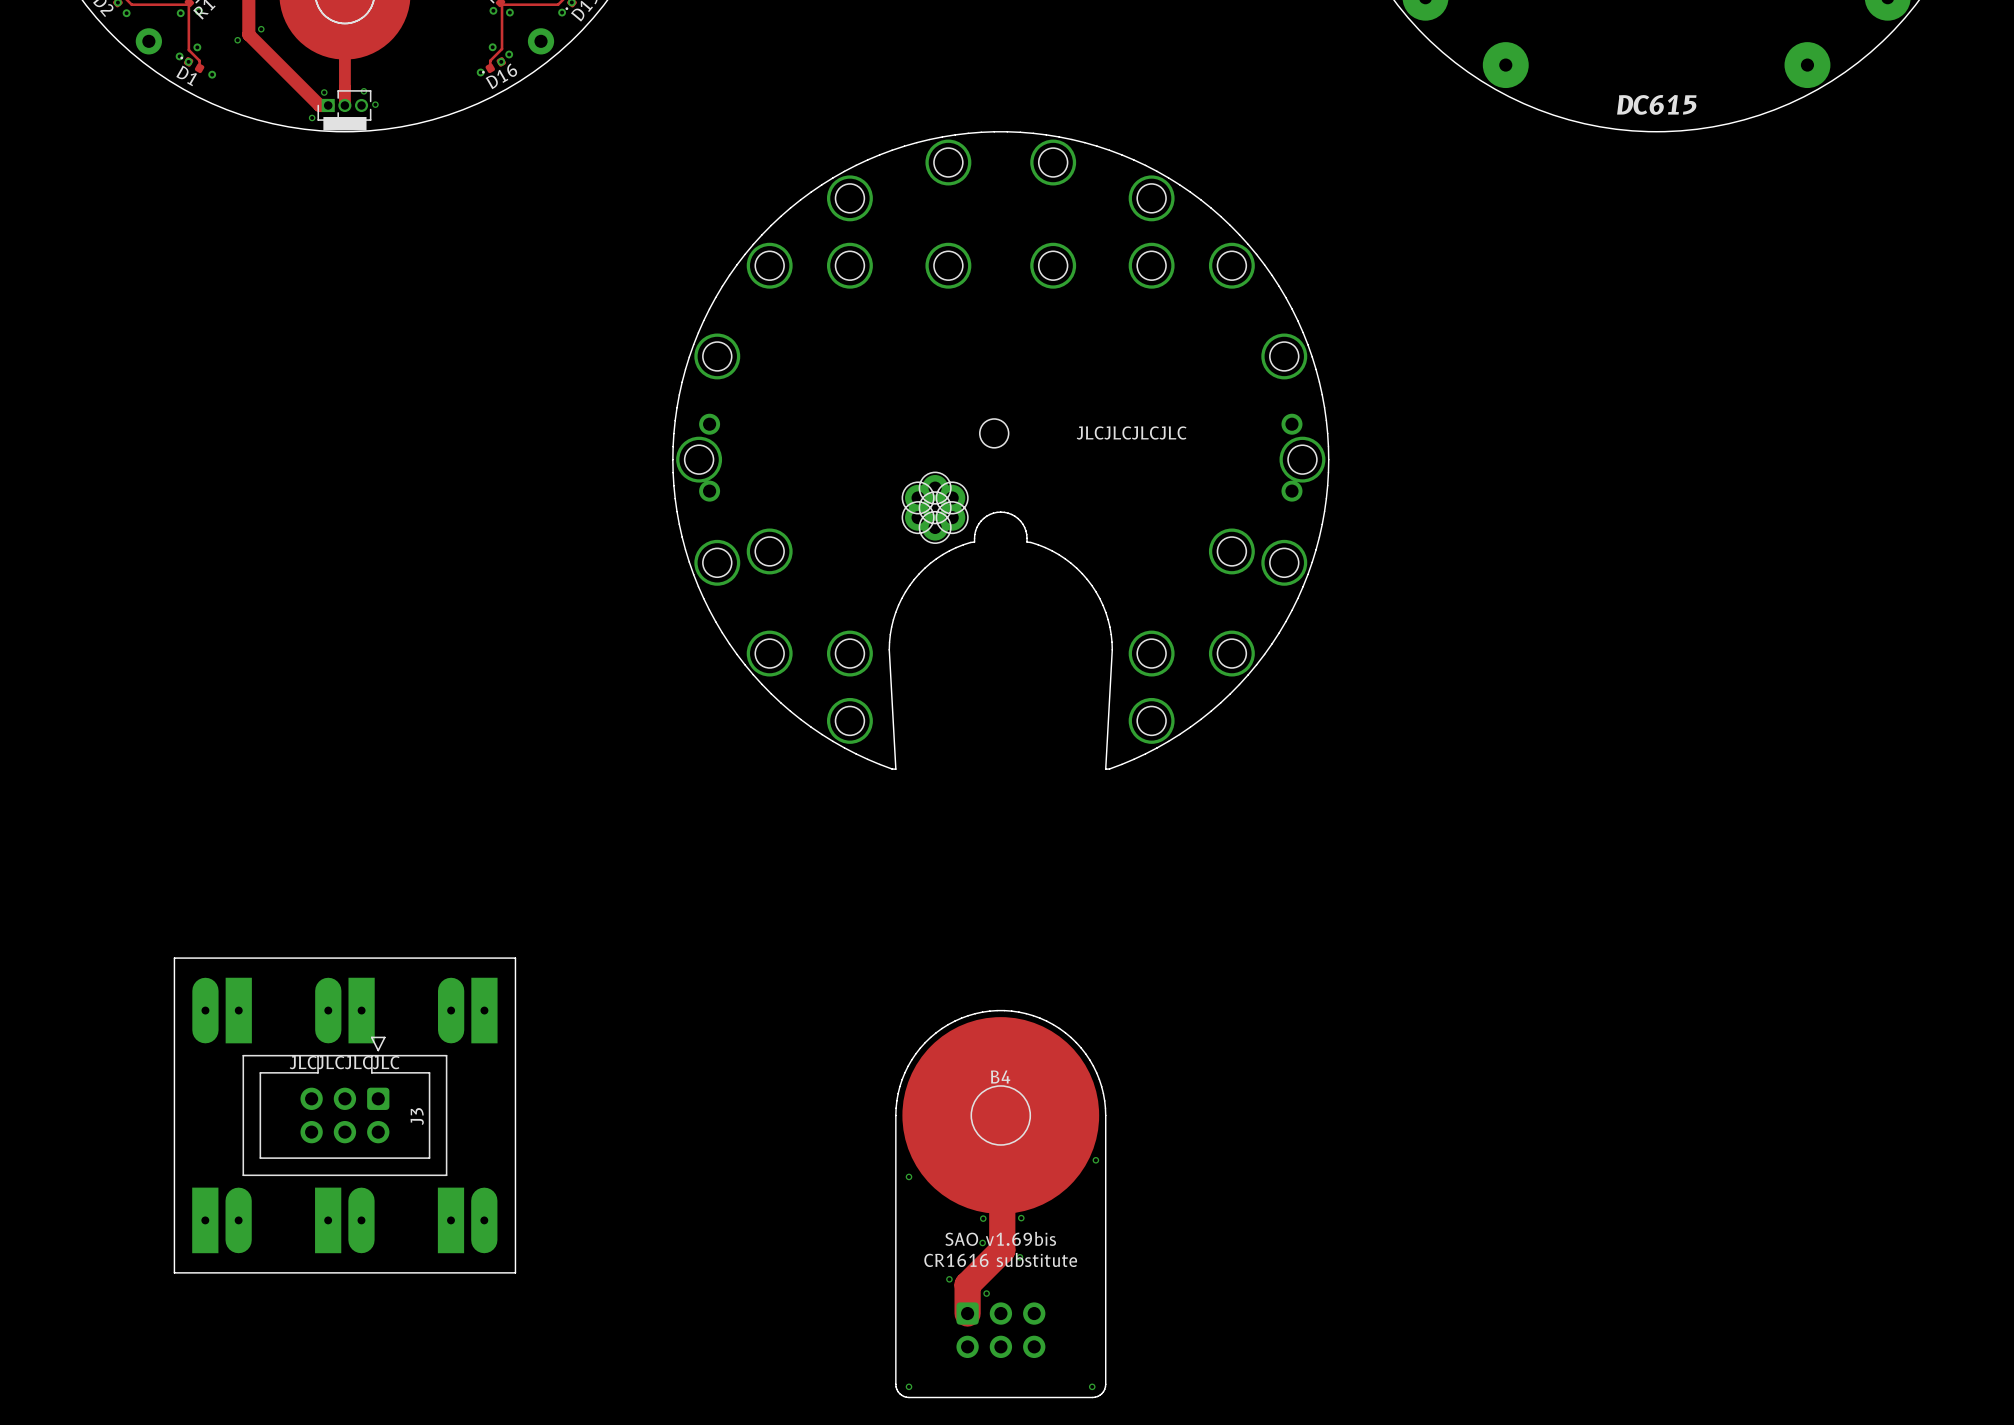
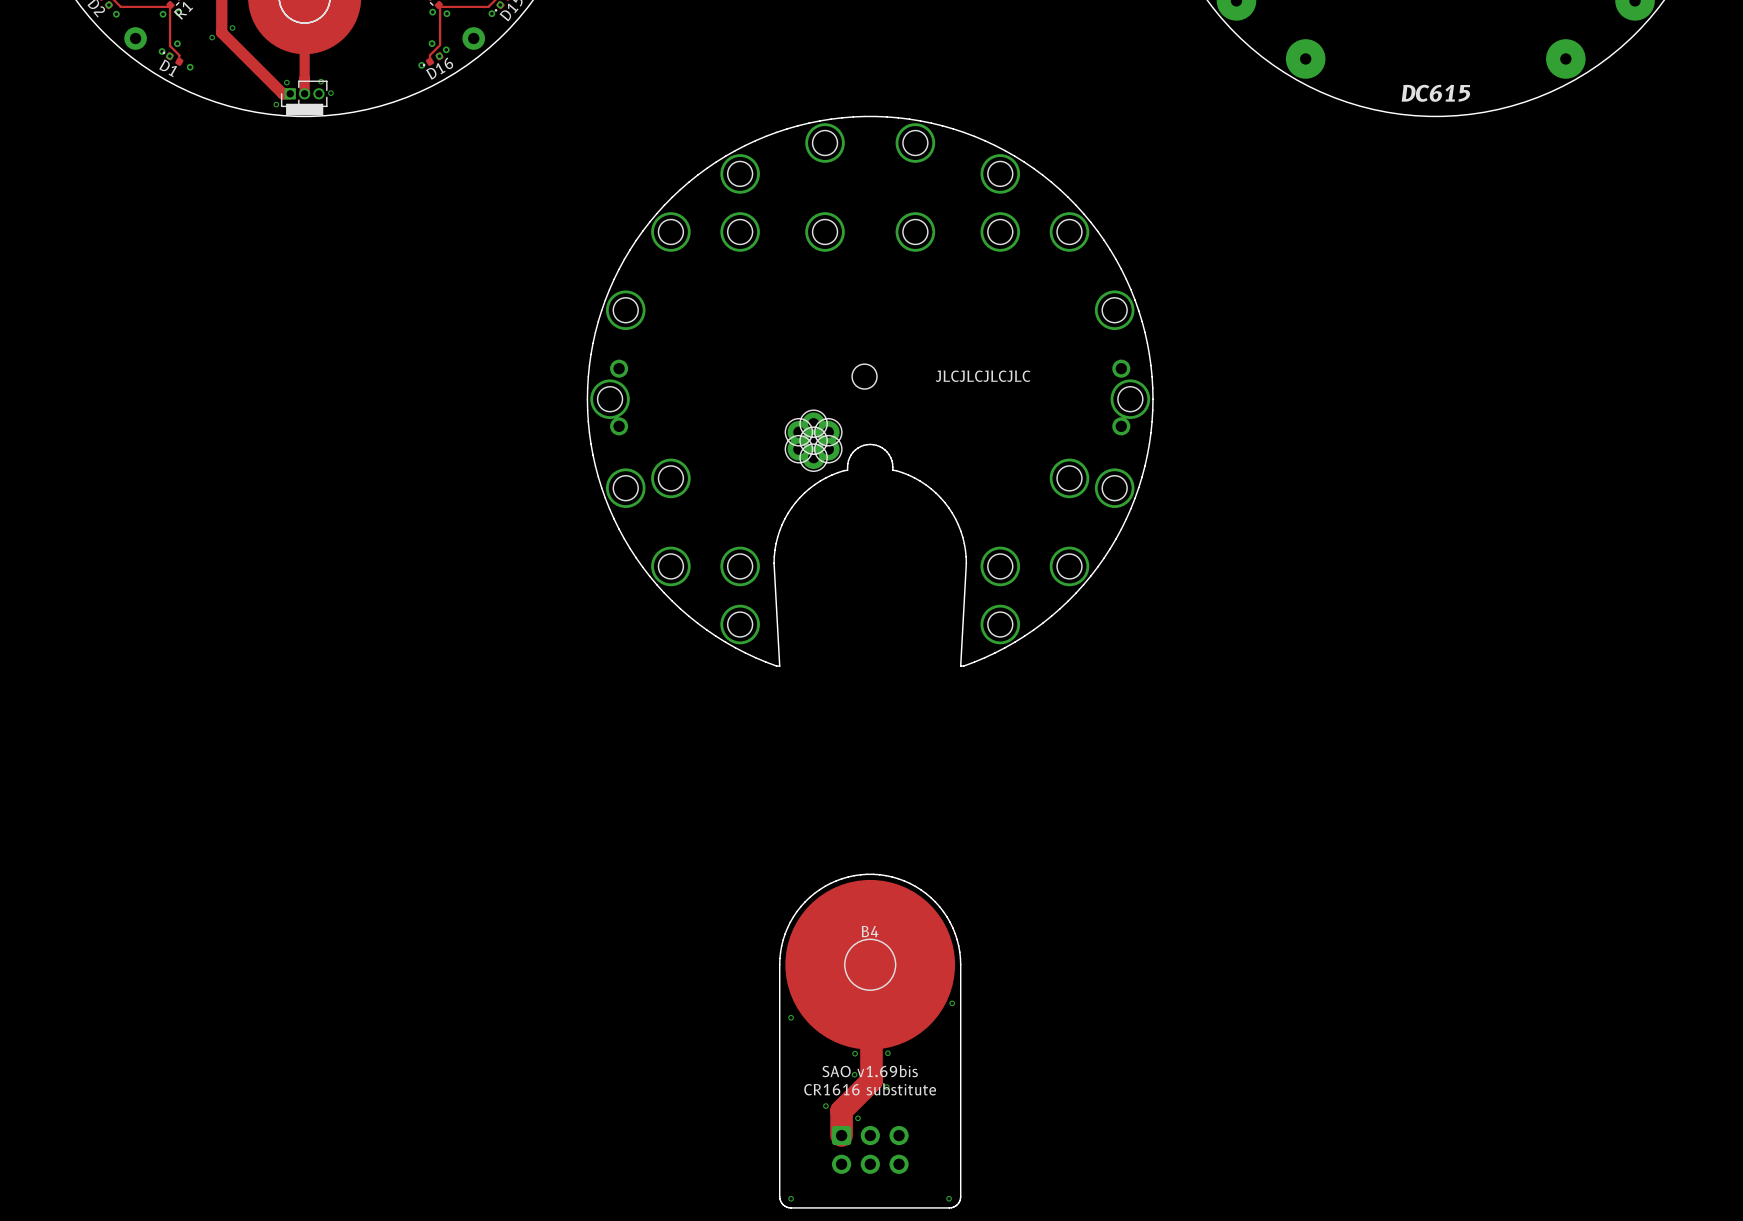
board edge: (174, 958) (515, 958) (515, 1272) (174, 1272) (174, 958) -> none
part: (222, 1010) -> none
part: (344, 1010) -> none
part: (467, 1010) -> none
text: JLCJLCJLCJLC (344, 1062) -> none
J3: (344, 1106) -> none
part: (221, 1220) -> none
part: (344, 1220) -> none
part: (467, 1220) -> none

